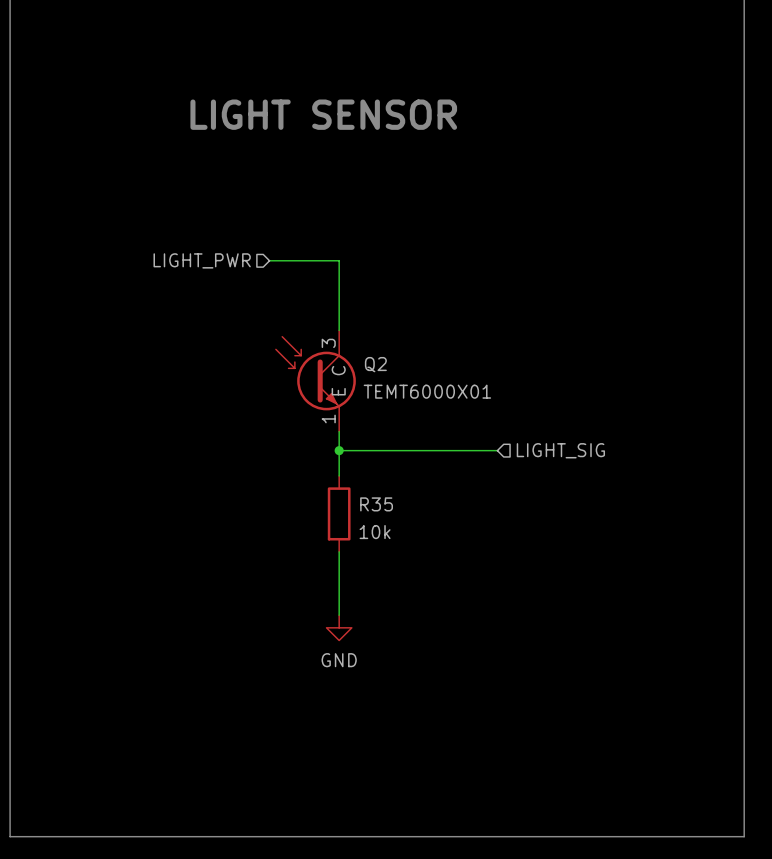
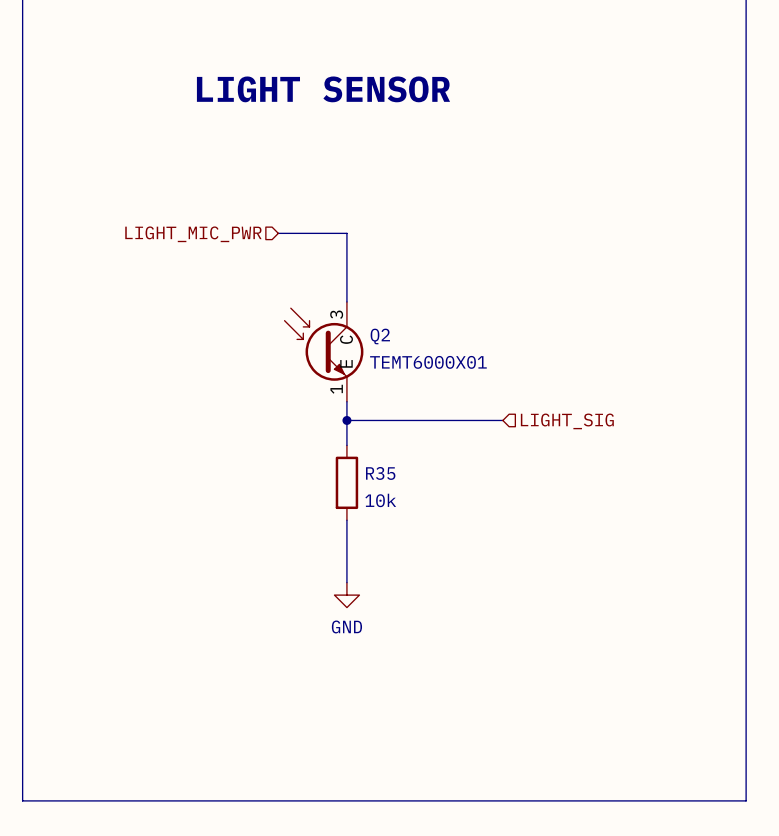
hierarchical label: LIGHT_PWR (202, 260) -> LIGHT_MIC_PWR (193, 234)

